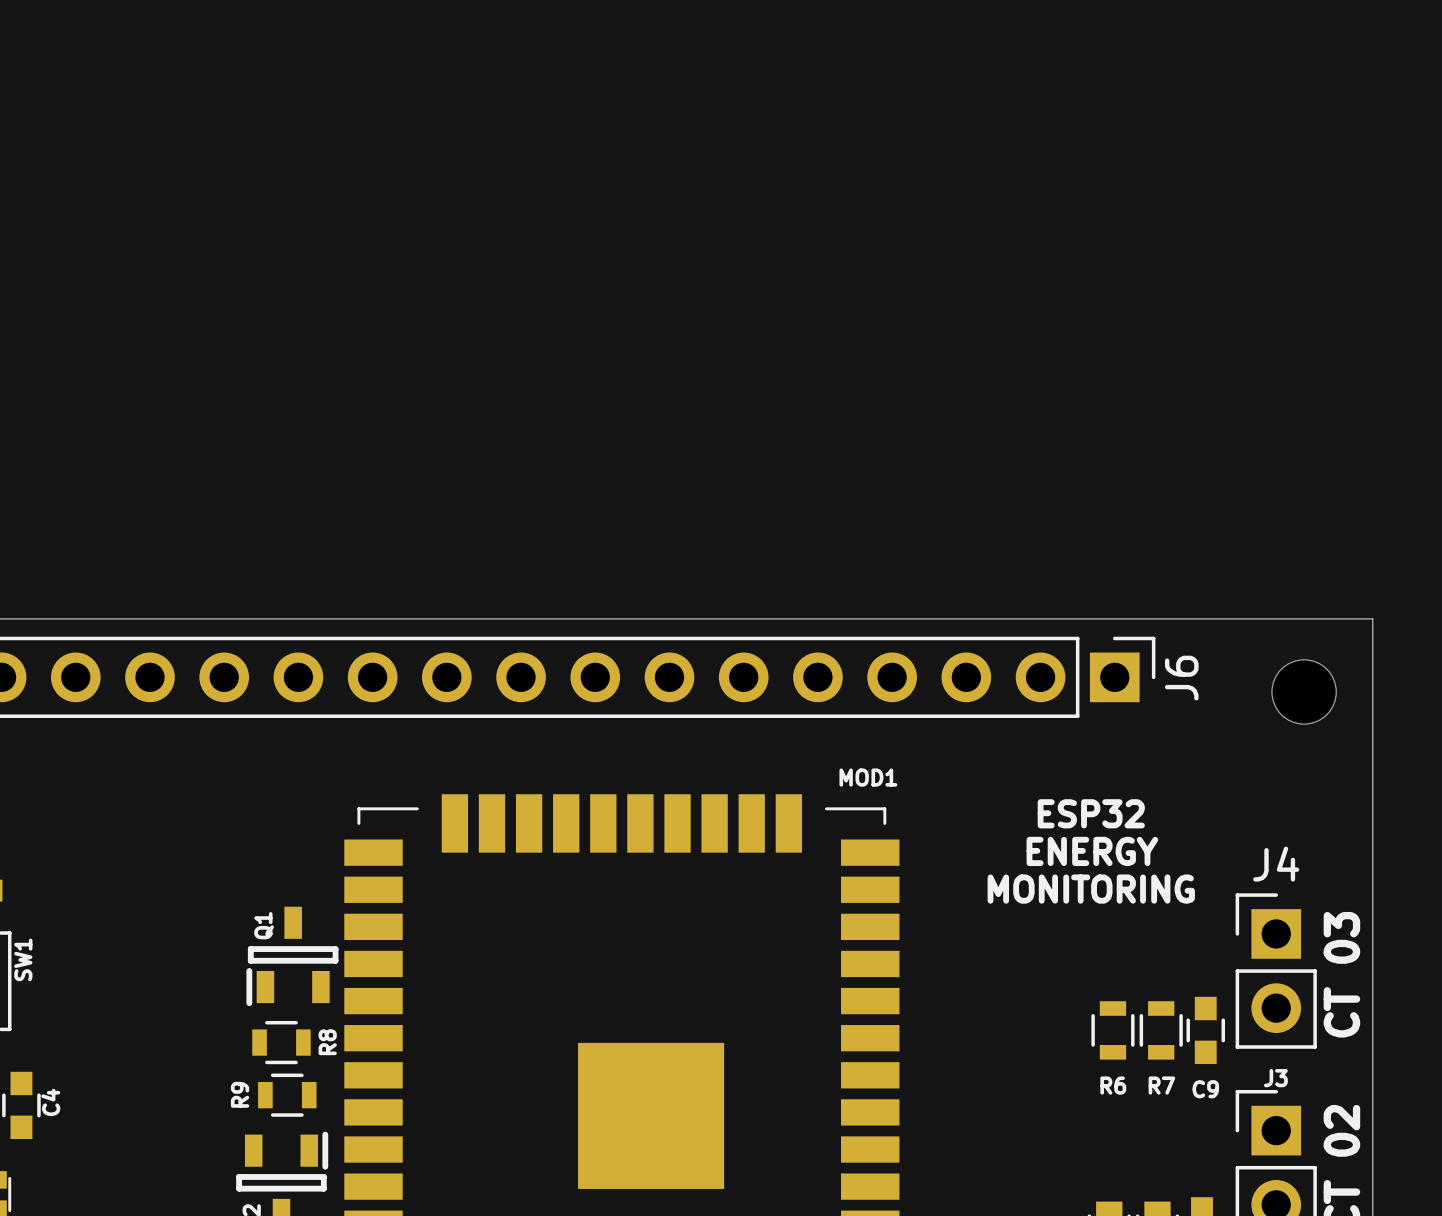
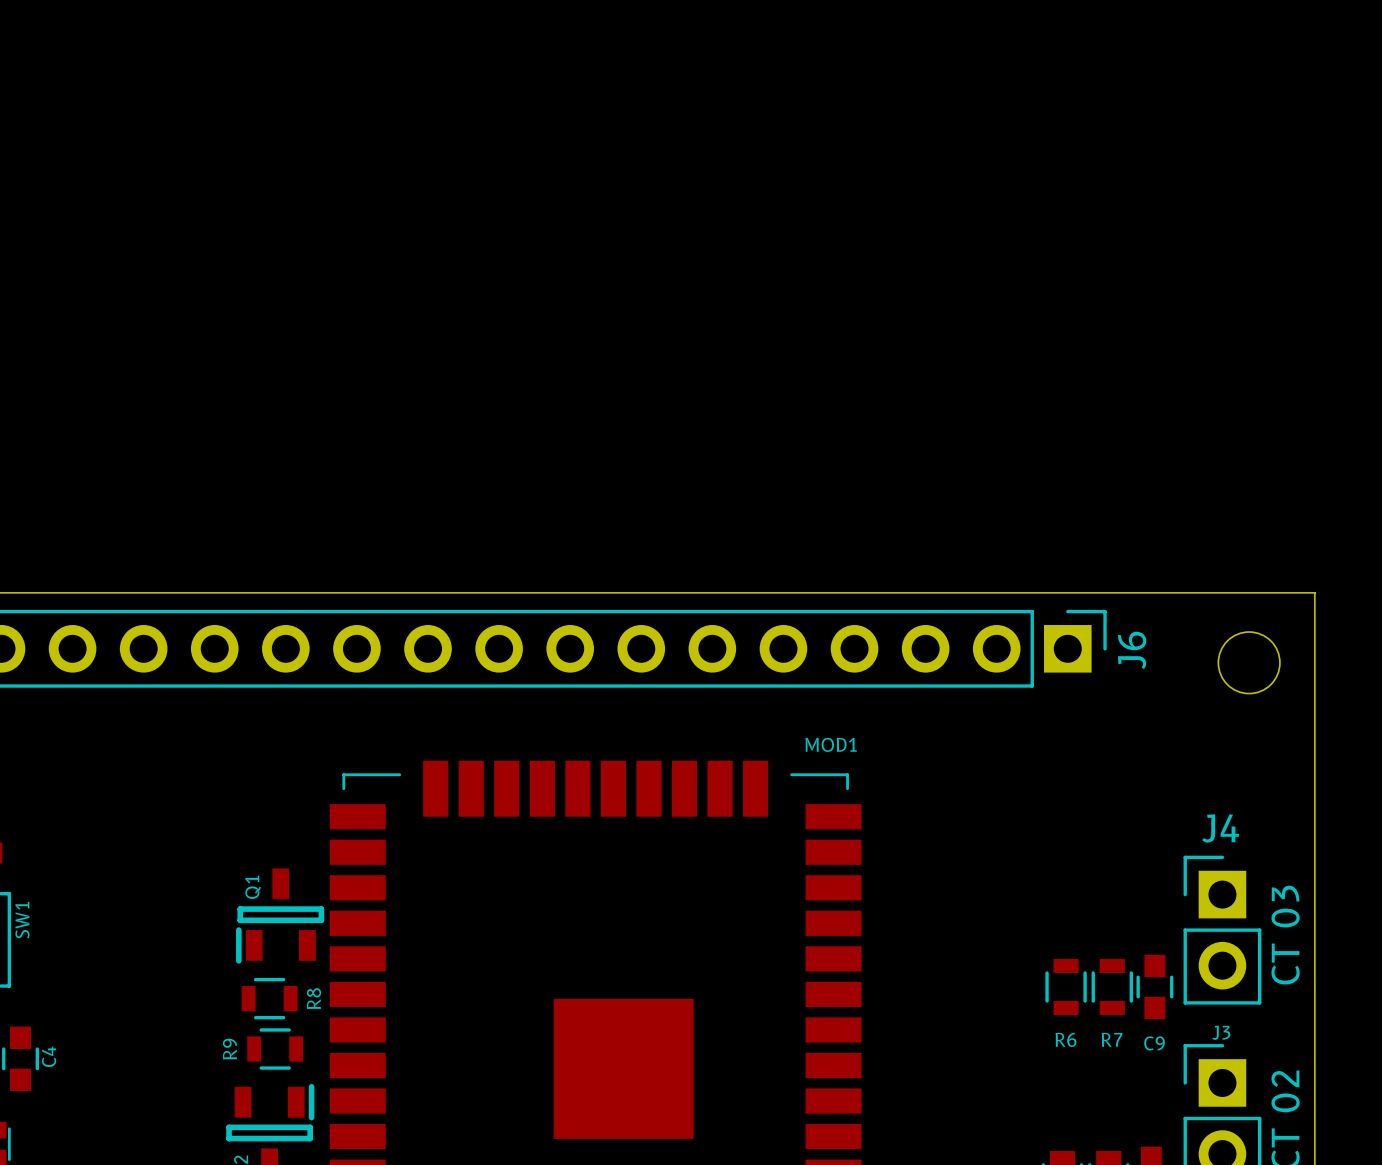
text: ESP32 (1091, 813) -> none
text: ENERGY (1092, 851) -> none
text: MONITORING (1091, 889) -> none

